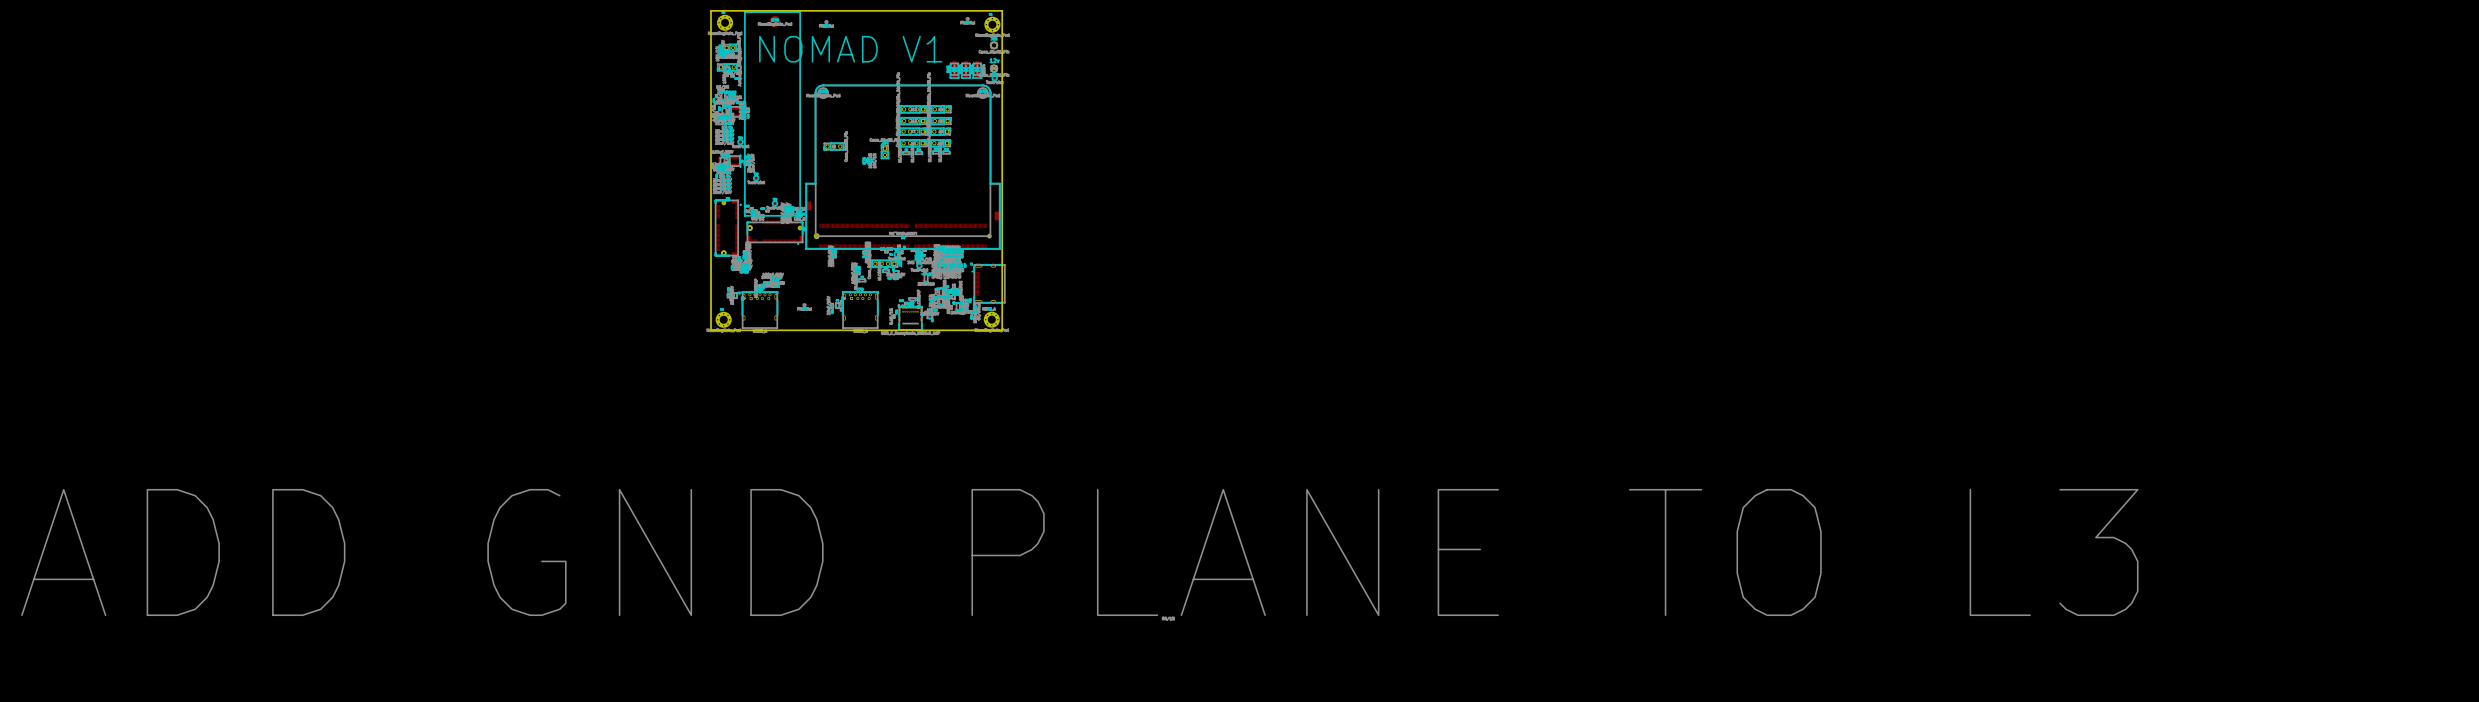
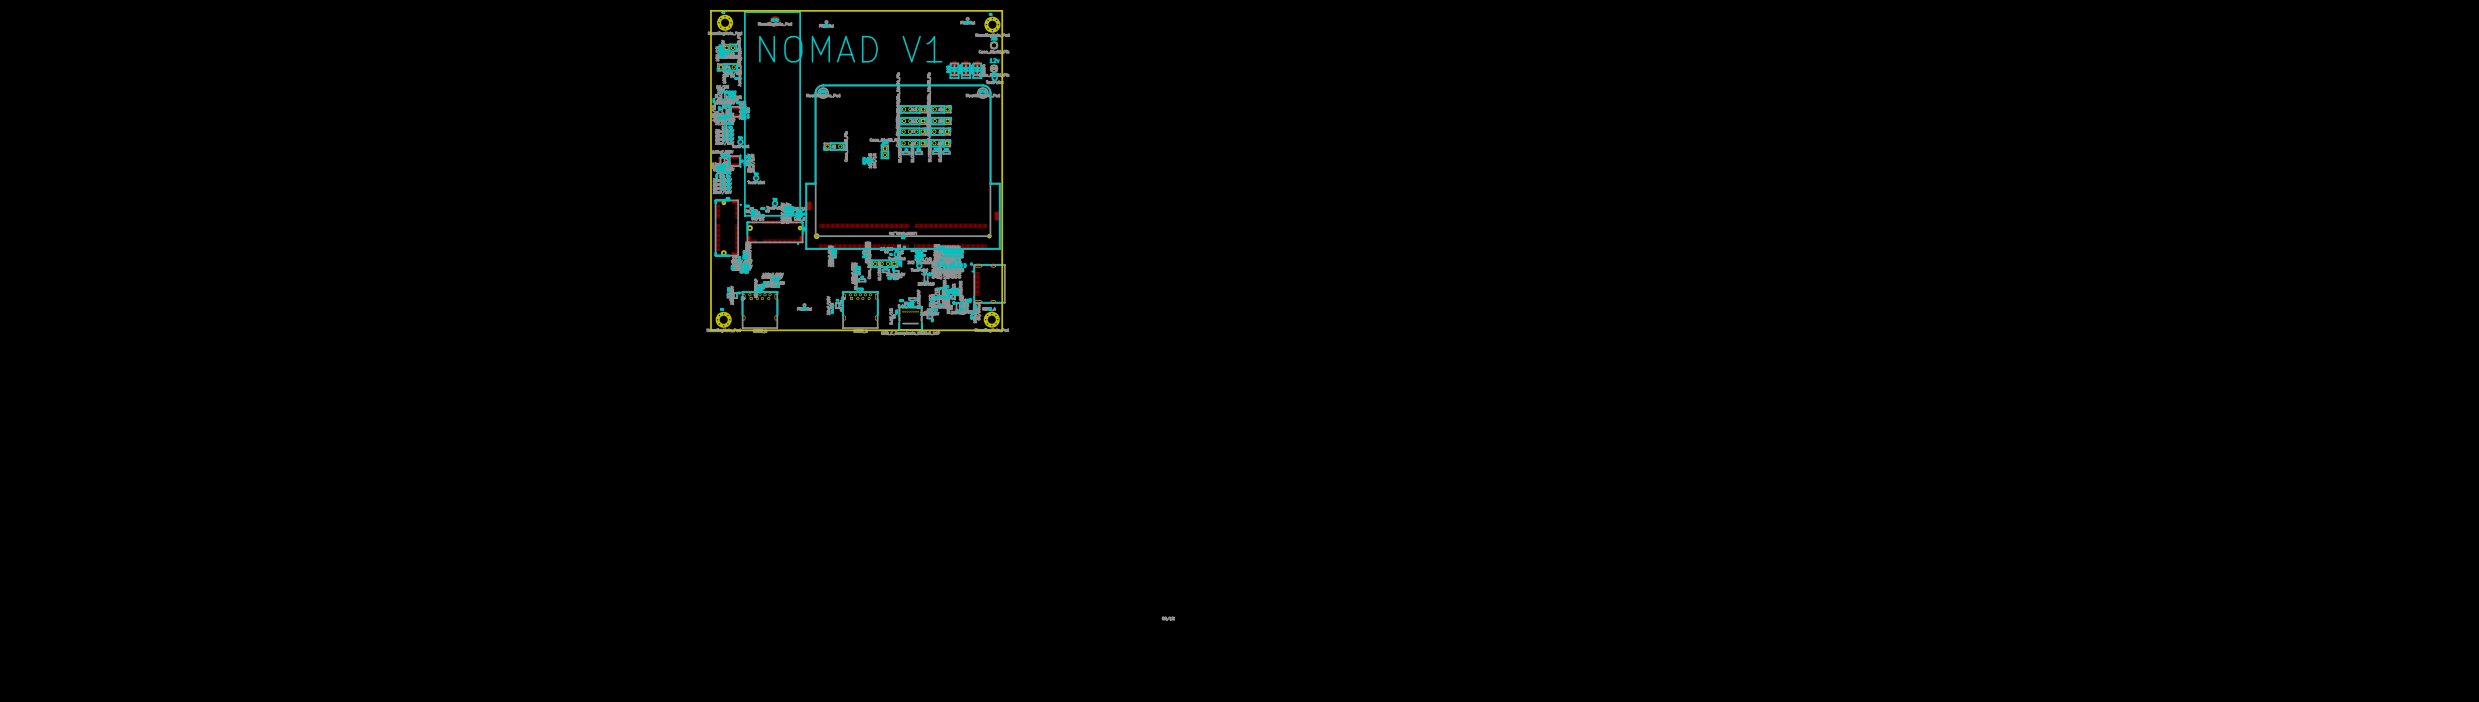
text: ADD GND PLANE TO L3 (1079, 552) -> none

